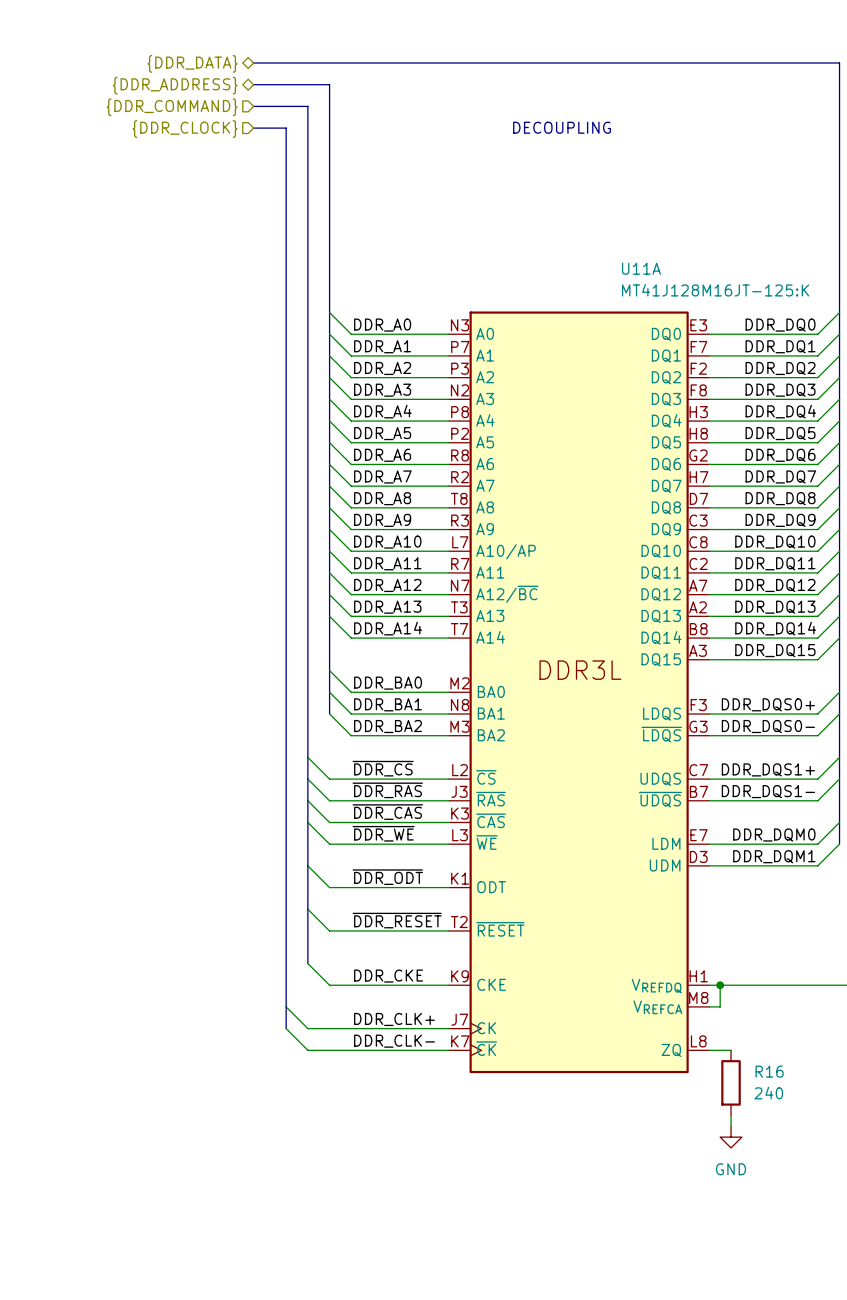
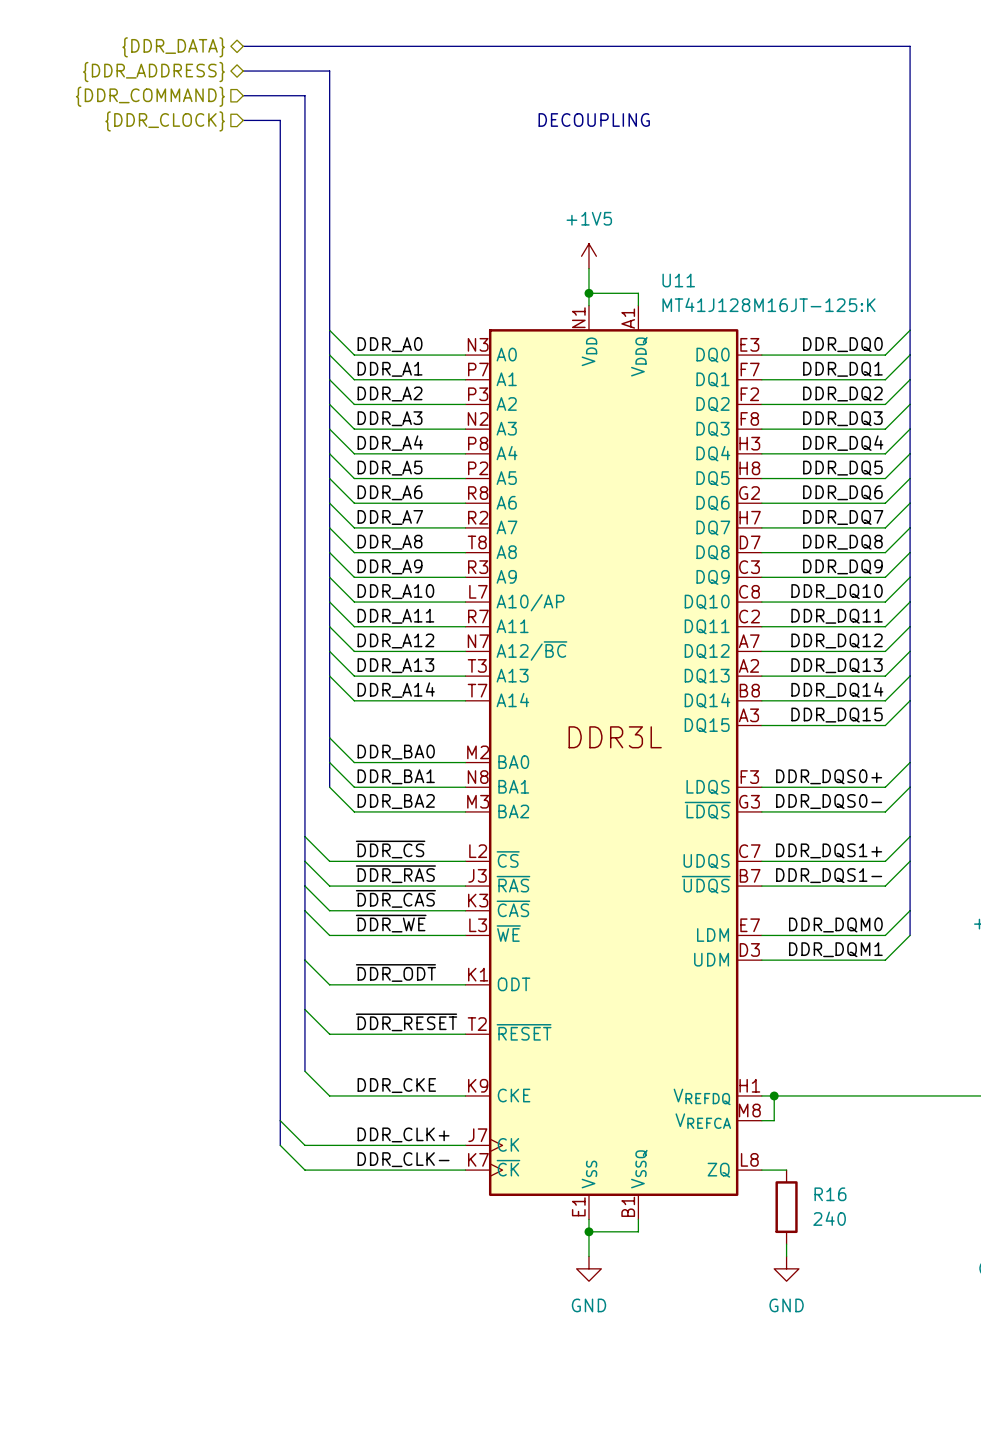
power symbol: none -> +1V5 (588, 256)
wire: none -> (588, 268) (588, 305)
wire: none -> (588, 293) (638, 293) (638, 305)
junction: none -> (588, 293)
U11A: MT41J128M16JT-125:K (579, 692) -> none
U11: none -> MT41J128M16JT-125:K (613, 762)
wire: none -> (588, 1219) (588, 1256)
wire: none -> (638, 1219) (638, 1231) (588, 1231)
junction: none -> (588, 1231)
power symbol: none -> GND (588, 1268)

